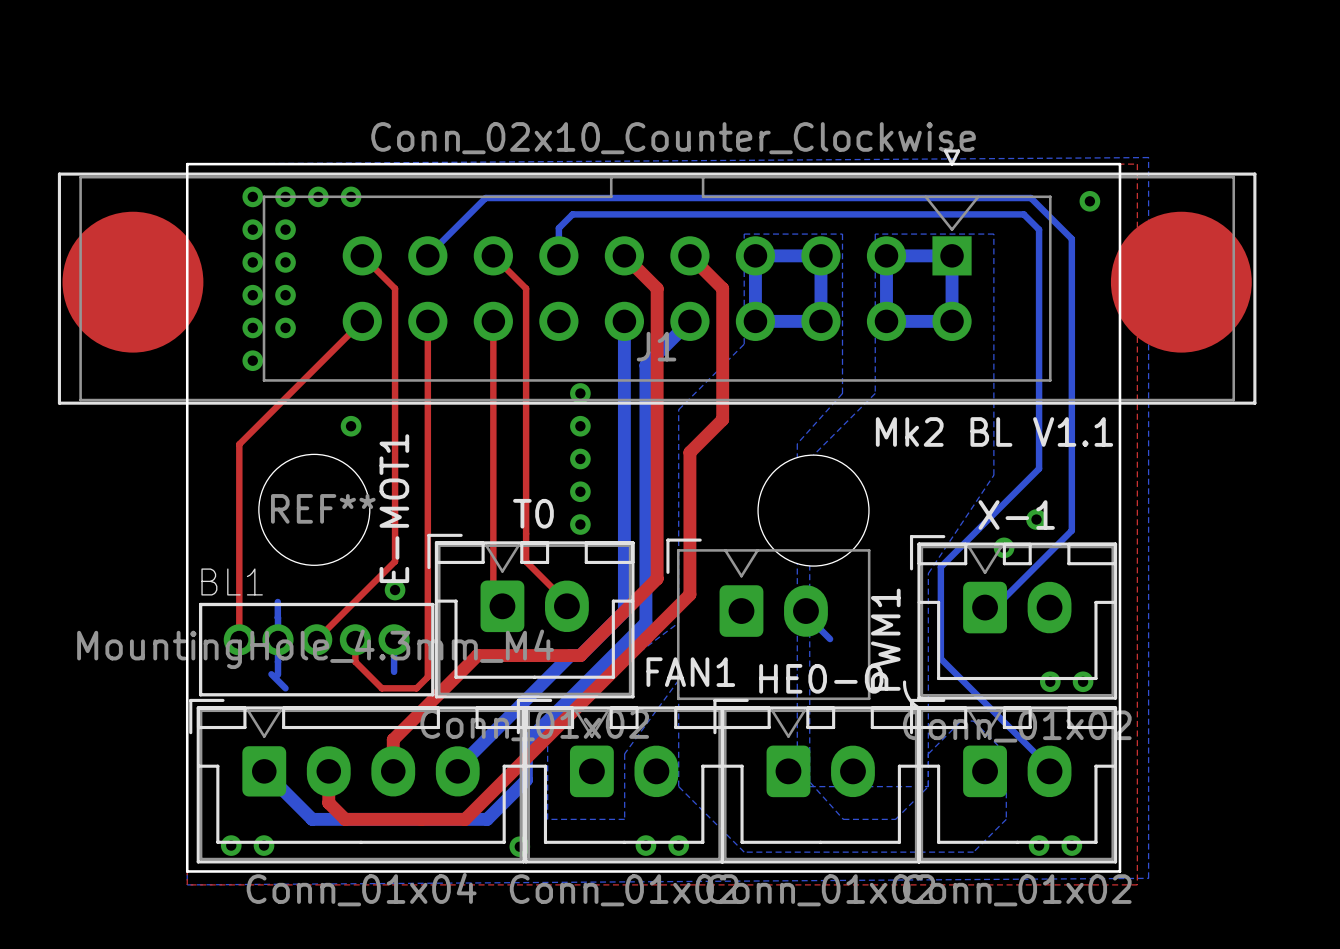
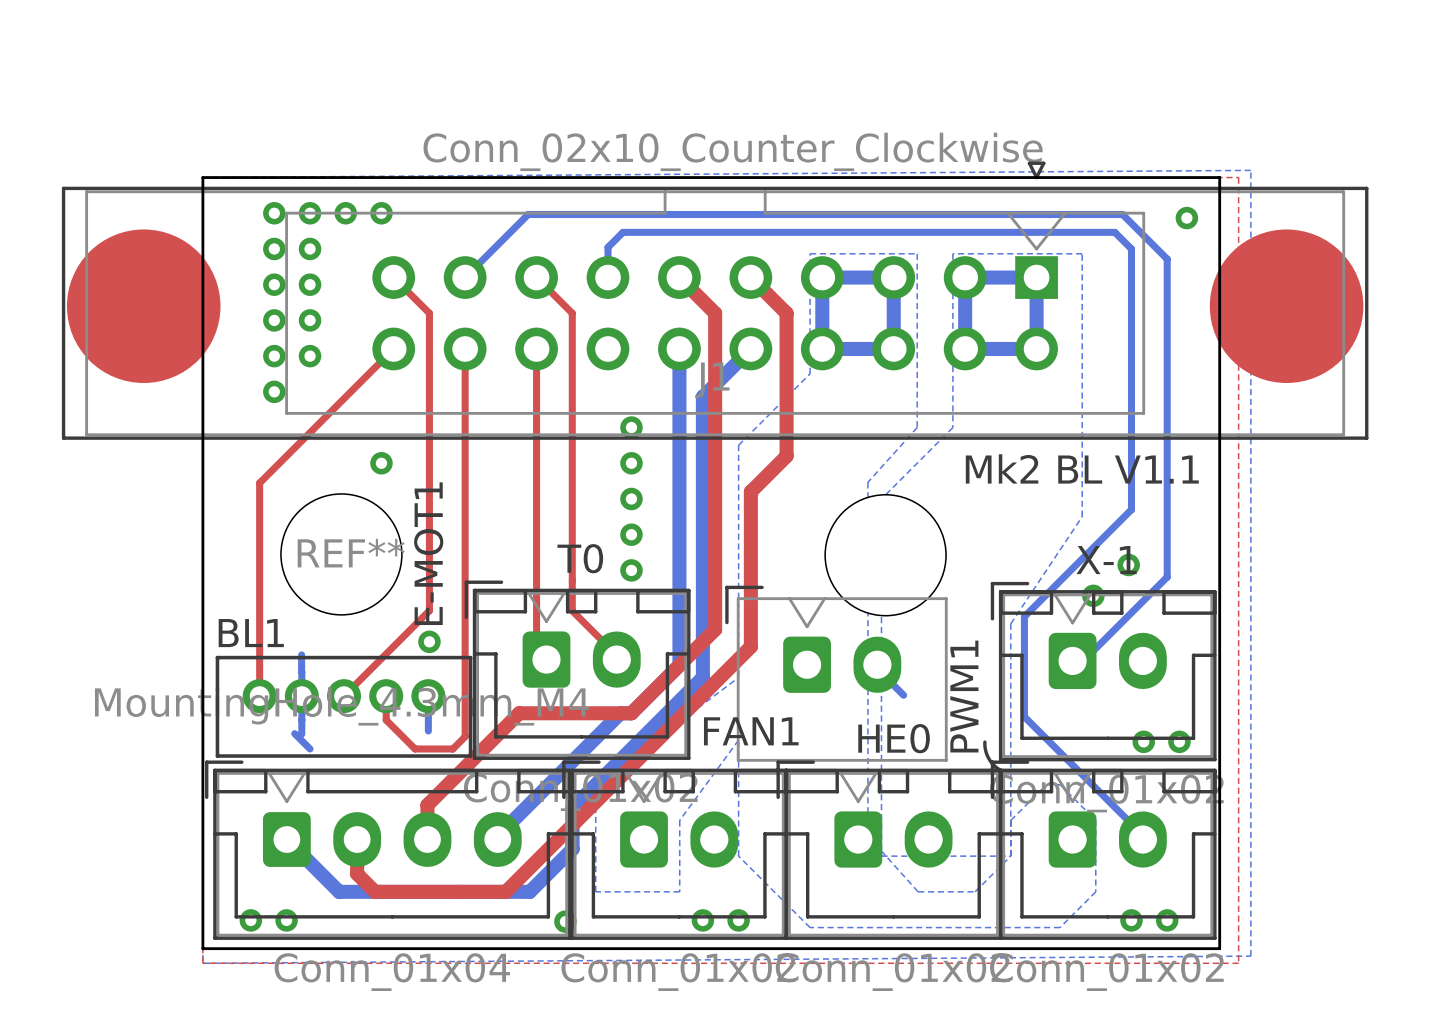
HE0-0 name: HE0-0 (821, 678) -> HE0 (894, 738)

